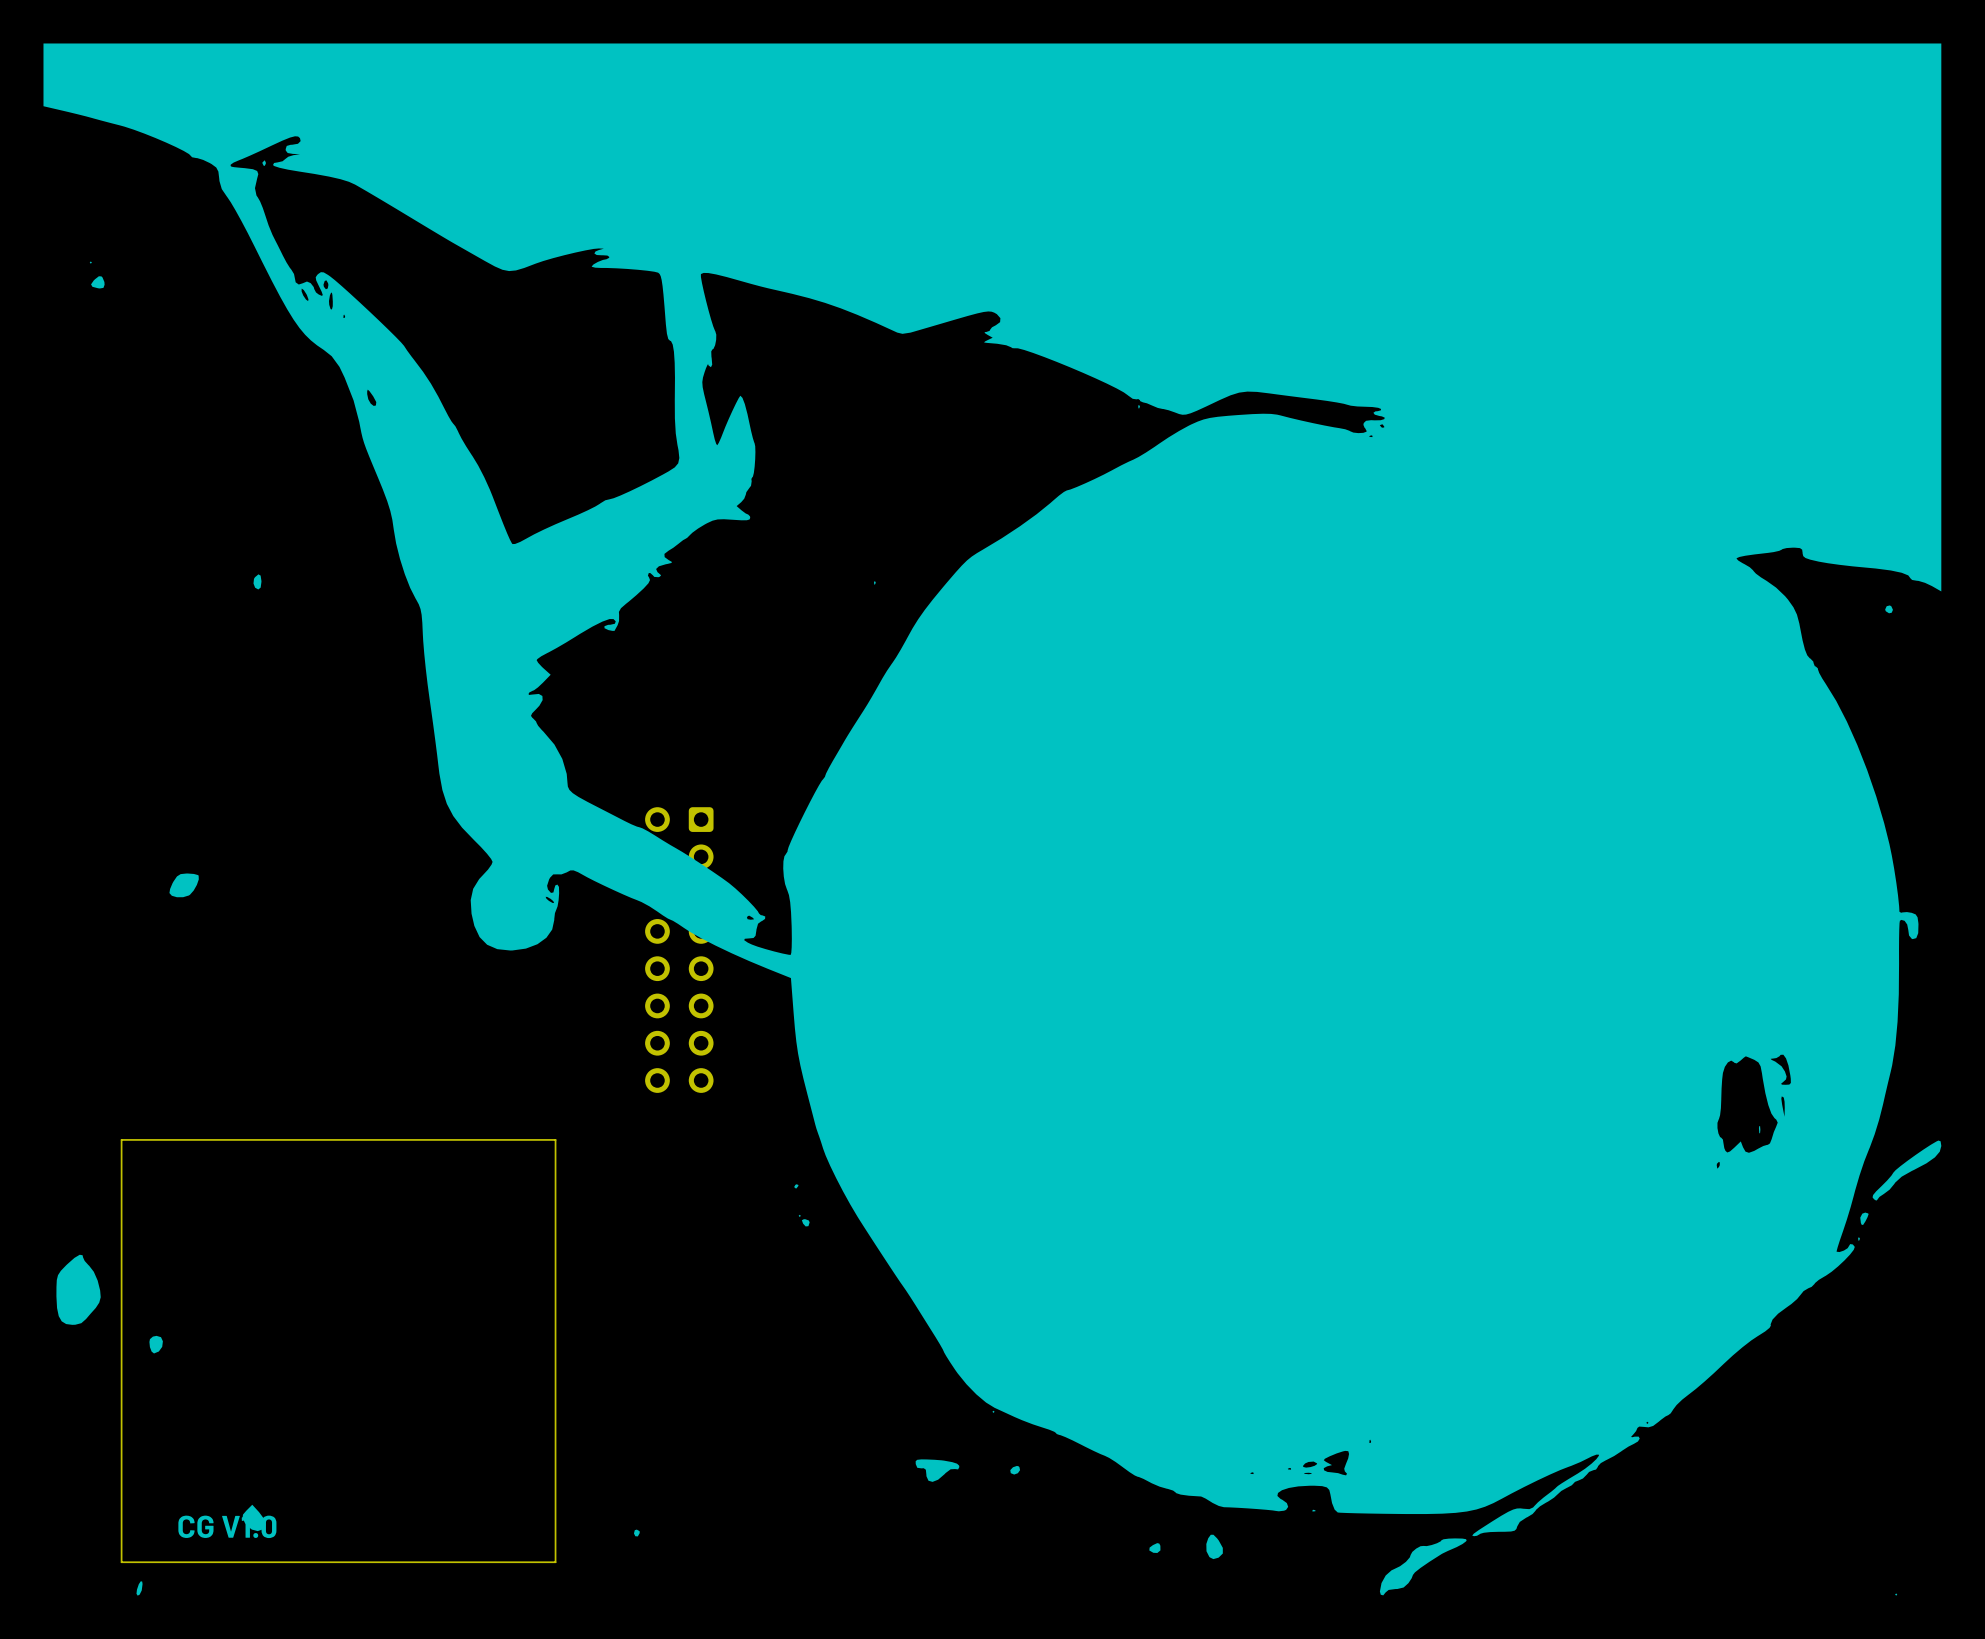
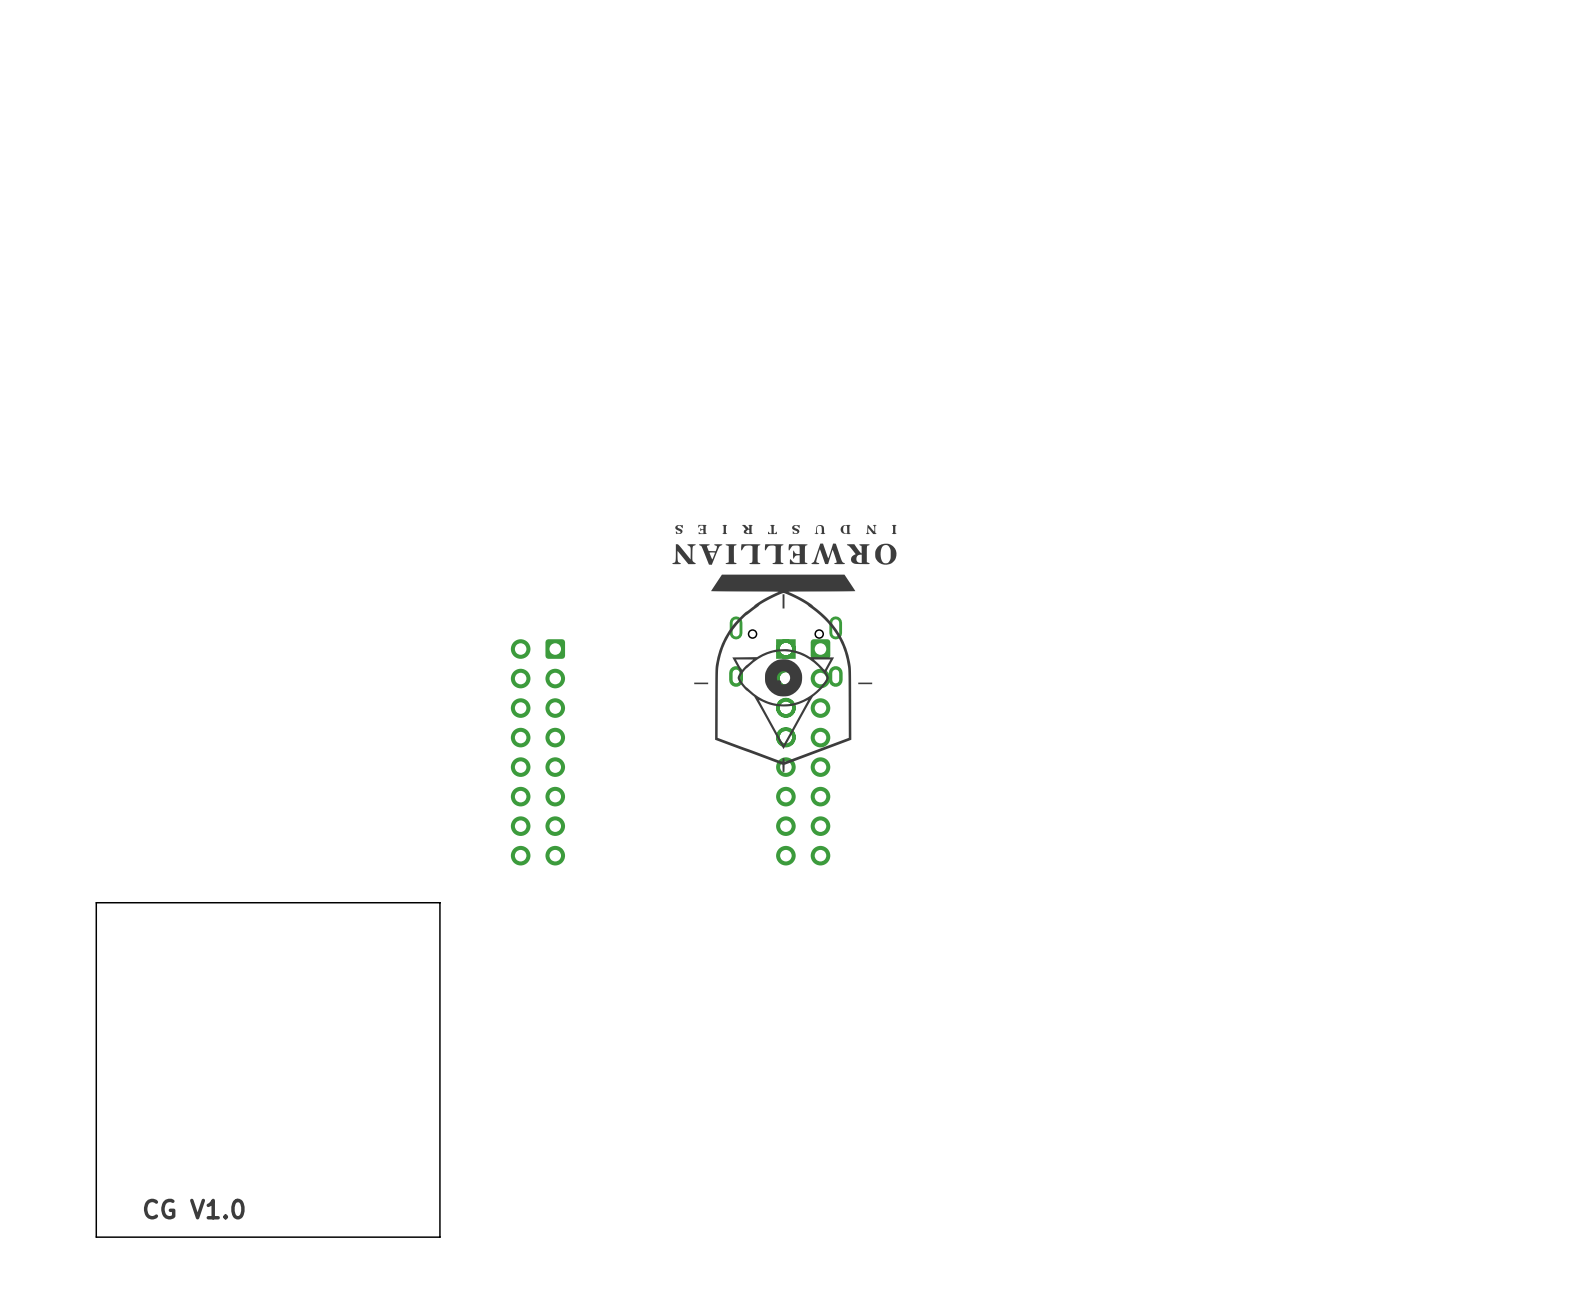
drawing: none -> [672, 524, 897, 772]
part: (992, 819) -> none

